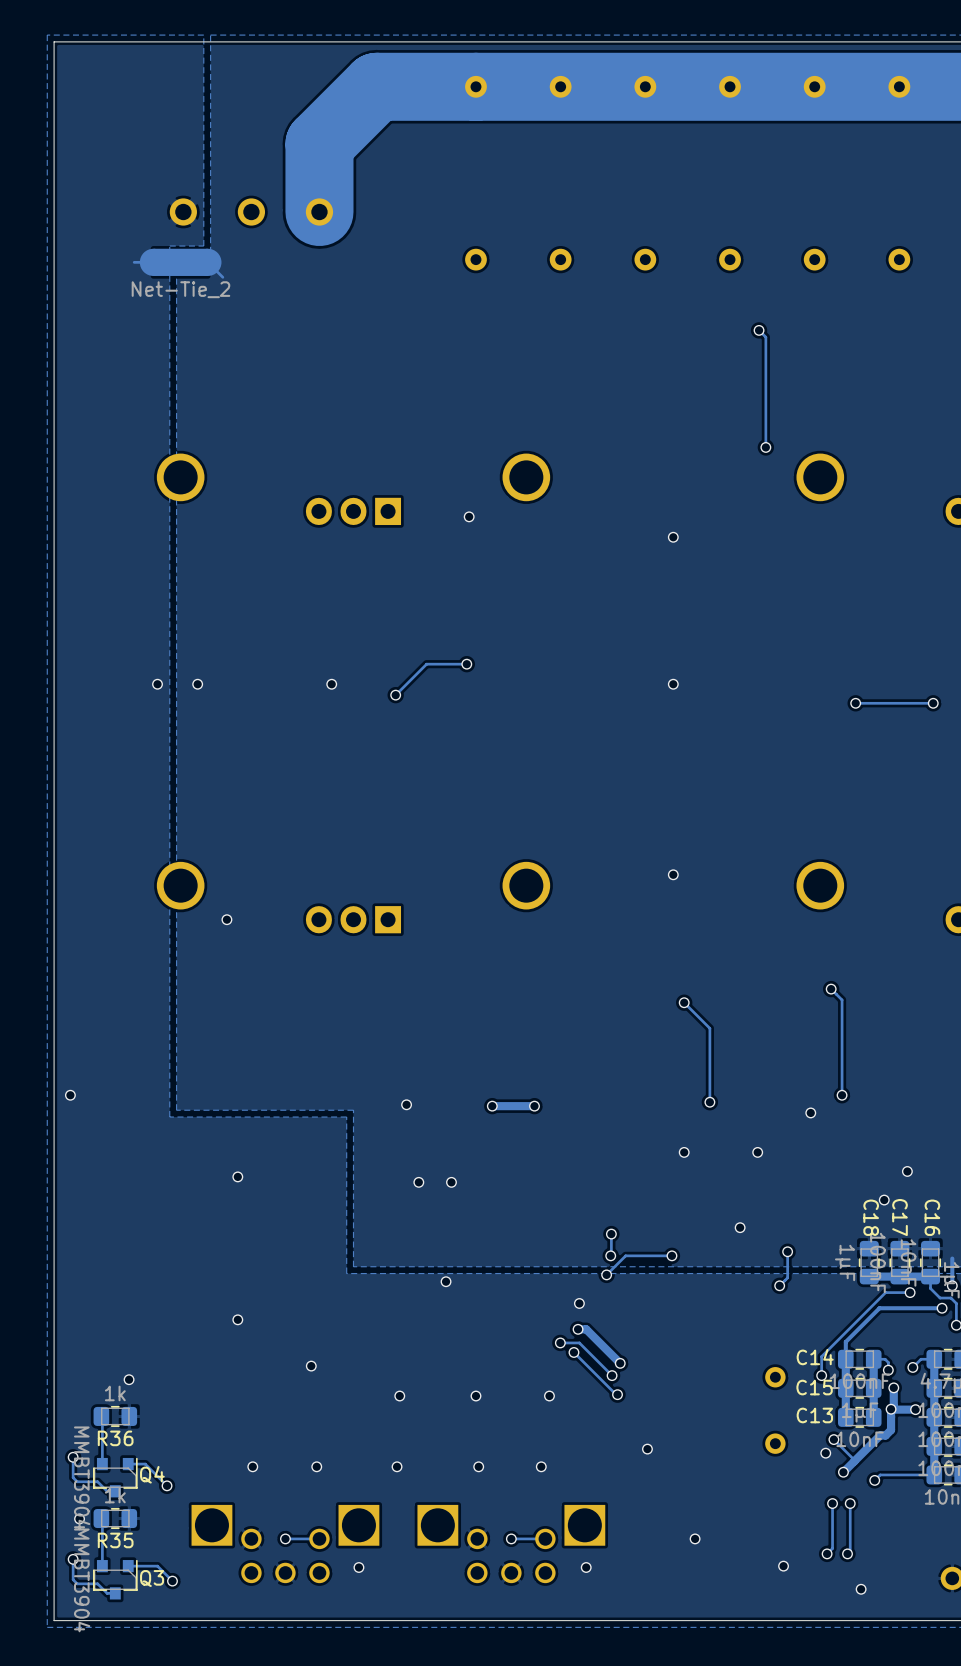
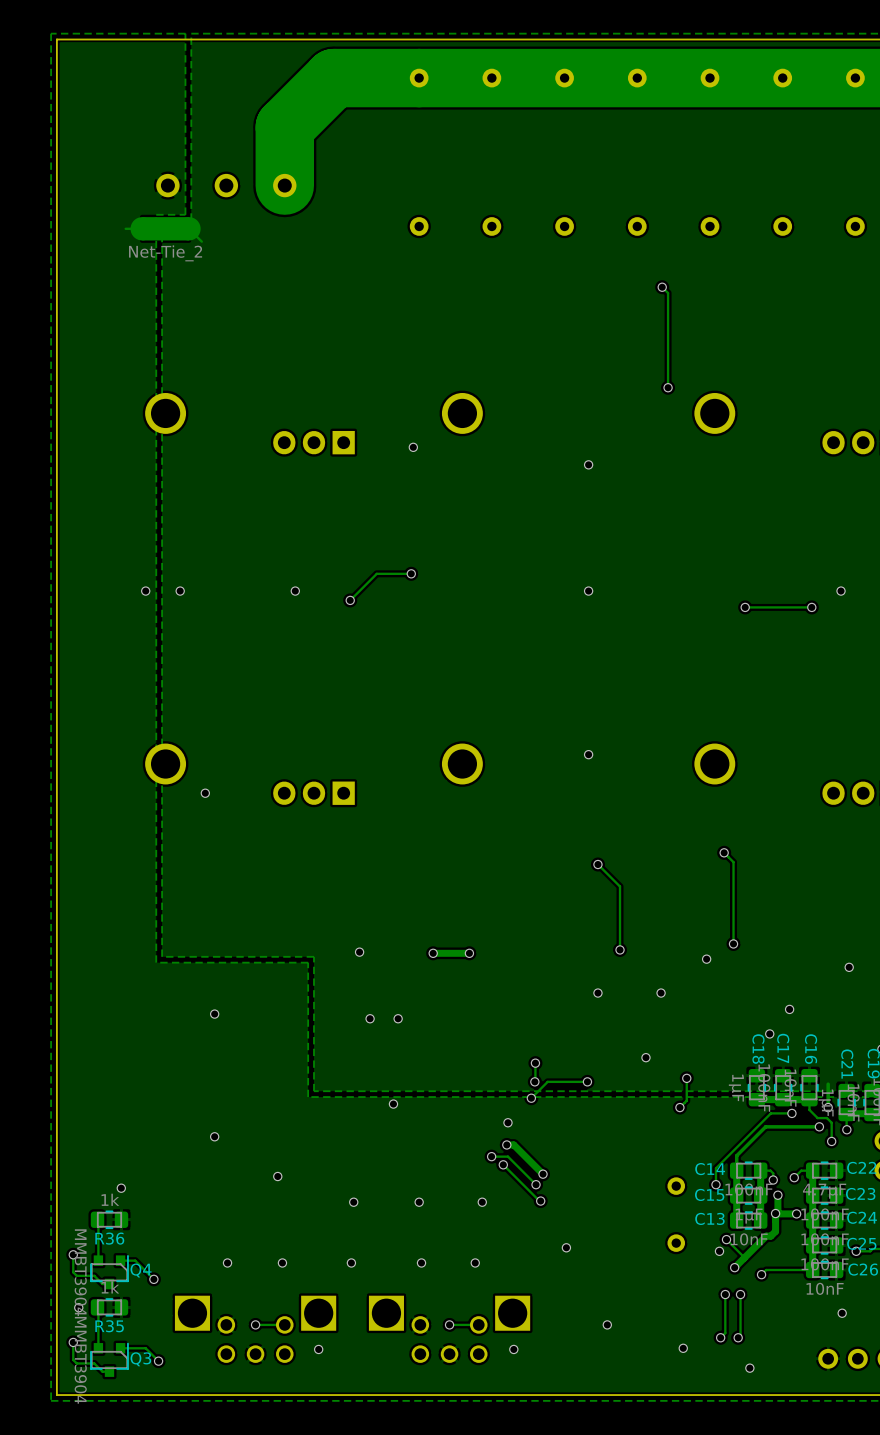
via: (70, 1095) -> none

